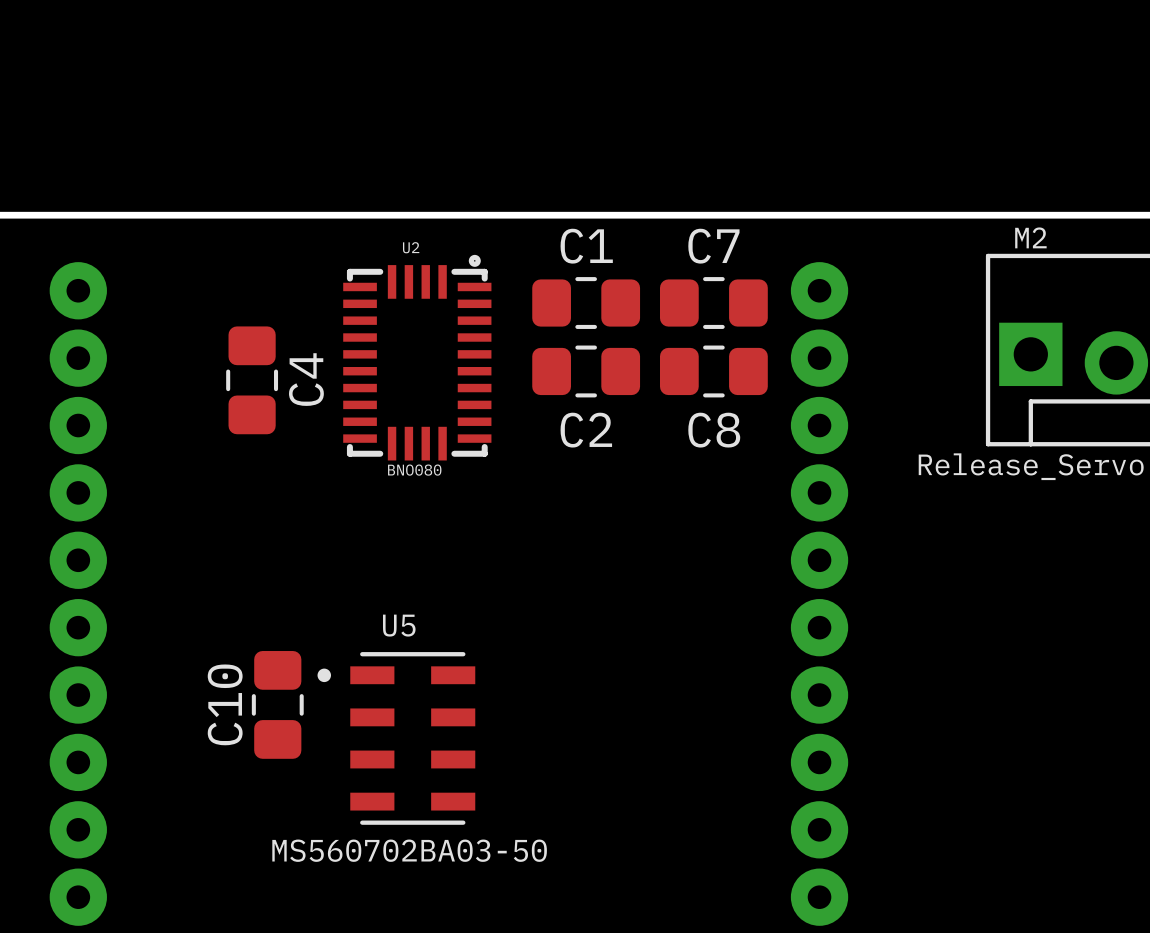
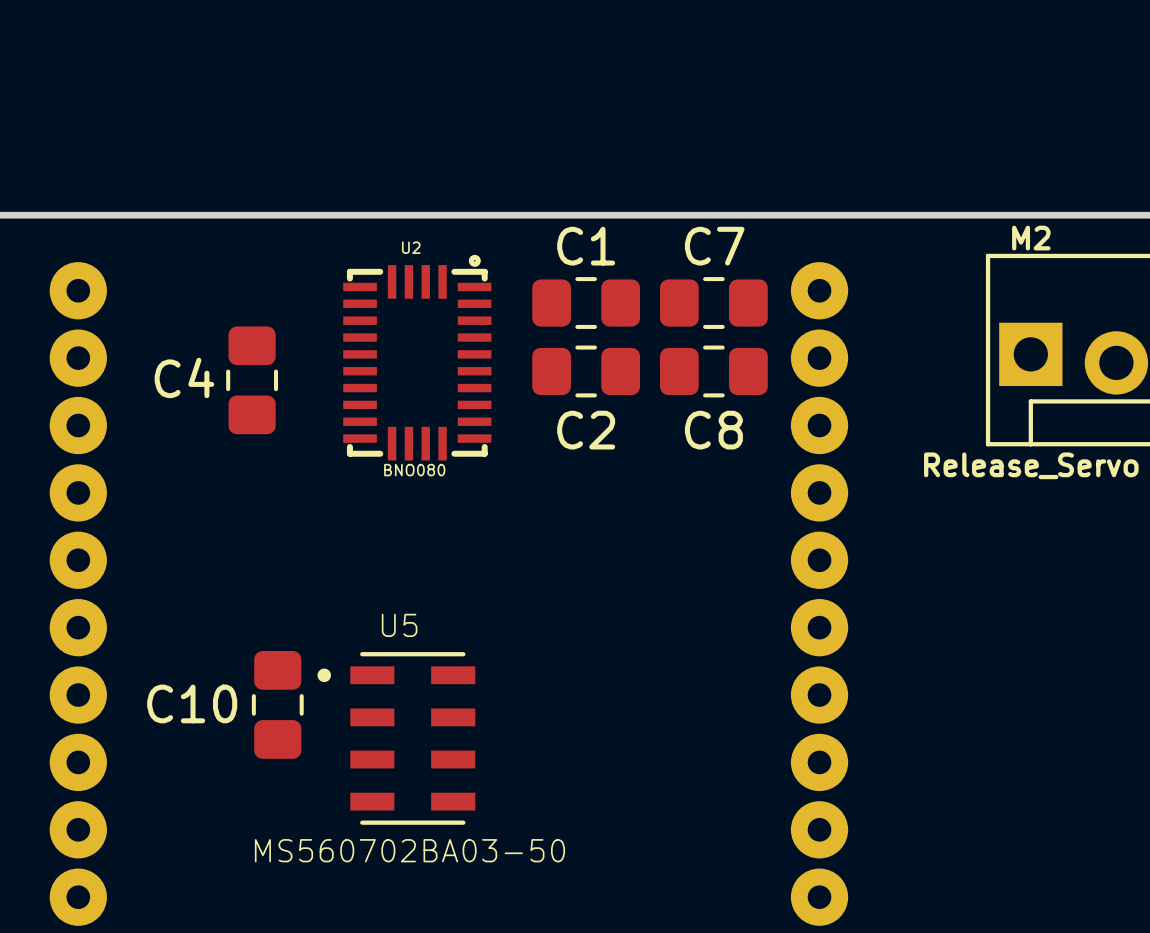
C4 name rotation: 0° (306, 379) -> 90° clockwise (184, 377)
C4 name position: C4 (306, 379) -> C4 (184, 377)
C10 name rotation: 0° (225, 704) -> 90° clockwise (192, 703)

